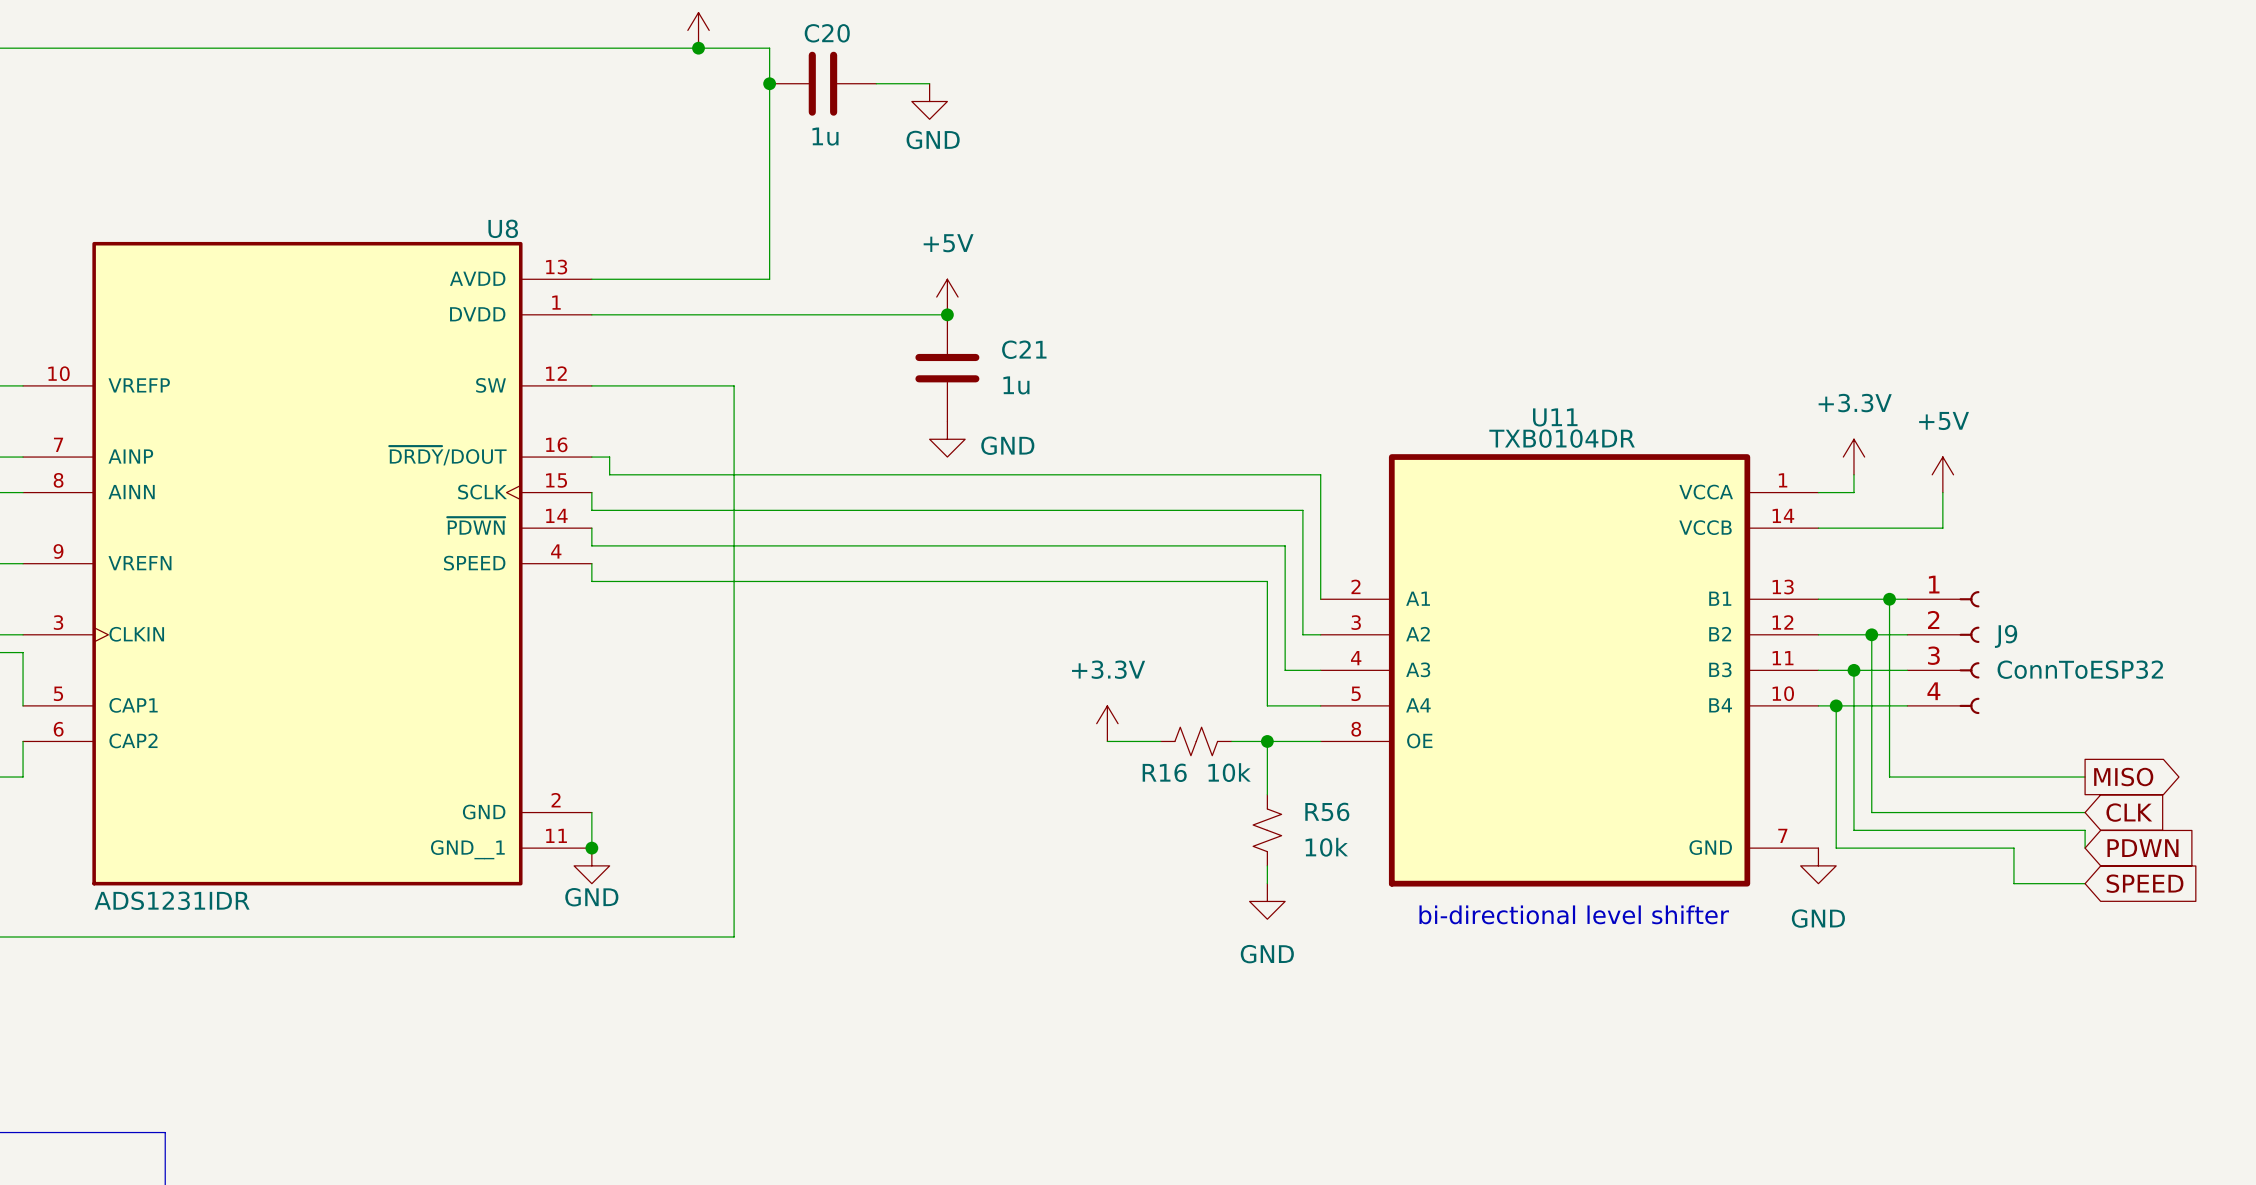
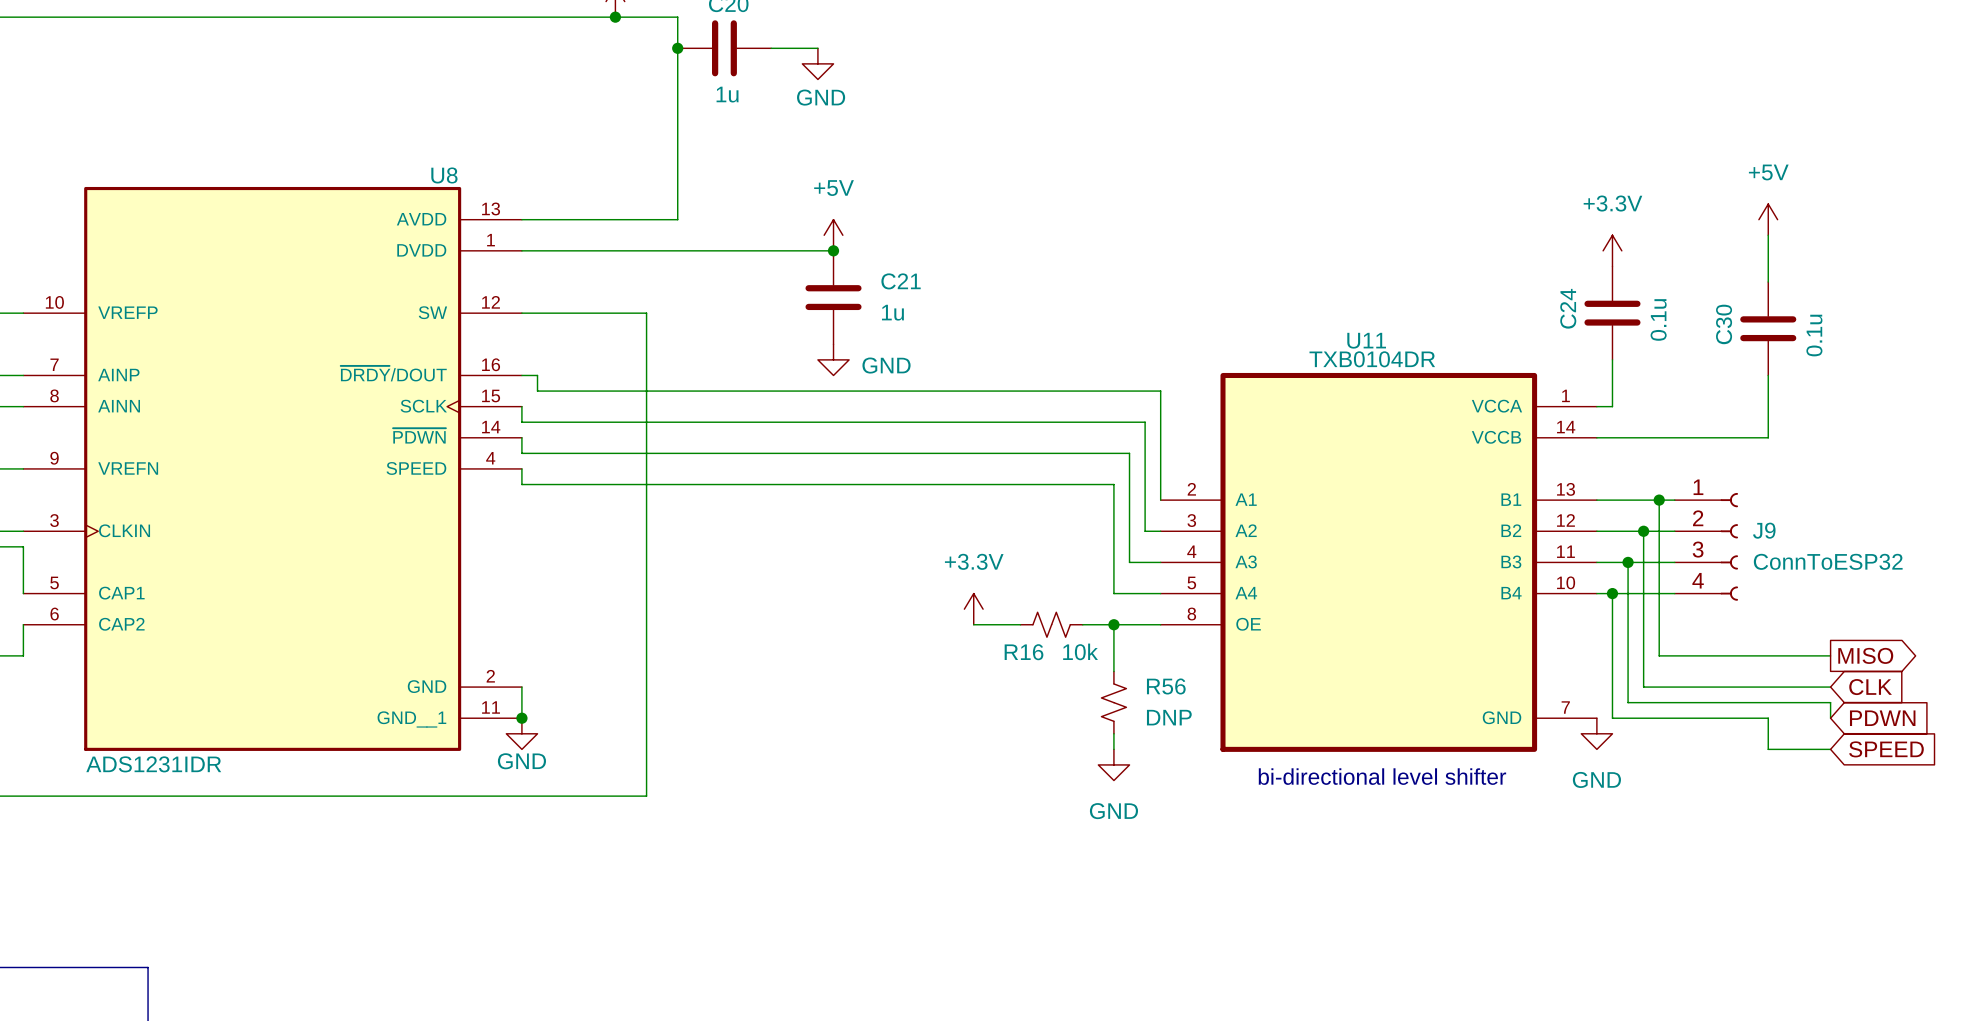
wire: none -> (1768, 235) (1768, 282)
C24: none -> 0.1u (1612, 313)
C30: none -> 0.1u (1768, 328)
power symbol position: +3.3V (1853, 457) -> +3.3V (1612, 250)
wire: (1853, 474) (1853, 492) (1836, 492) -> (1612, 359) (1612, 406)
power symbol position: +5V (1942, 474) -> +5V (1768, 219)
wire: (1942, 492) (1942, 528) -> (1768, 375) (1768, 437) (1705, 437)
R56 value: 10k (1326, 847) -> DNP (1169, 717)

